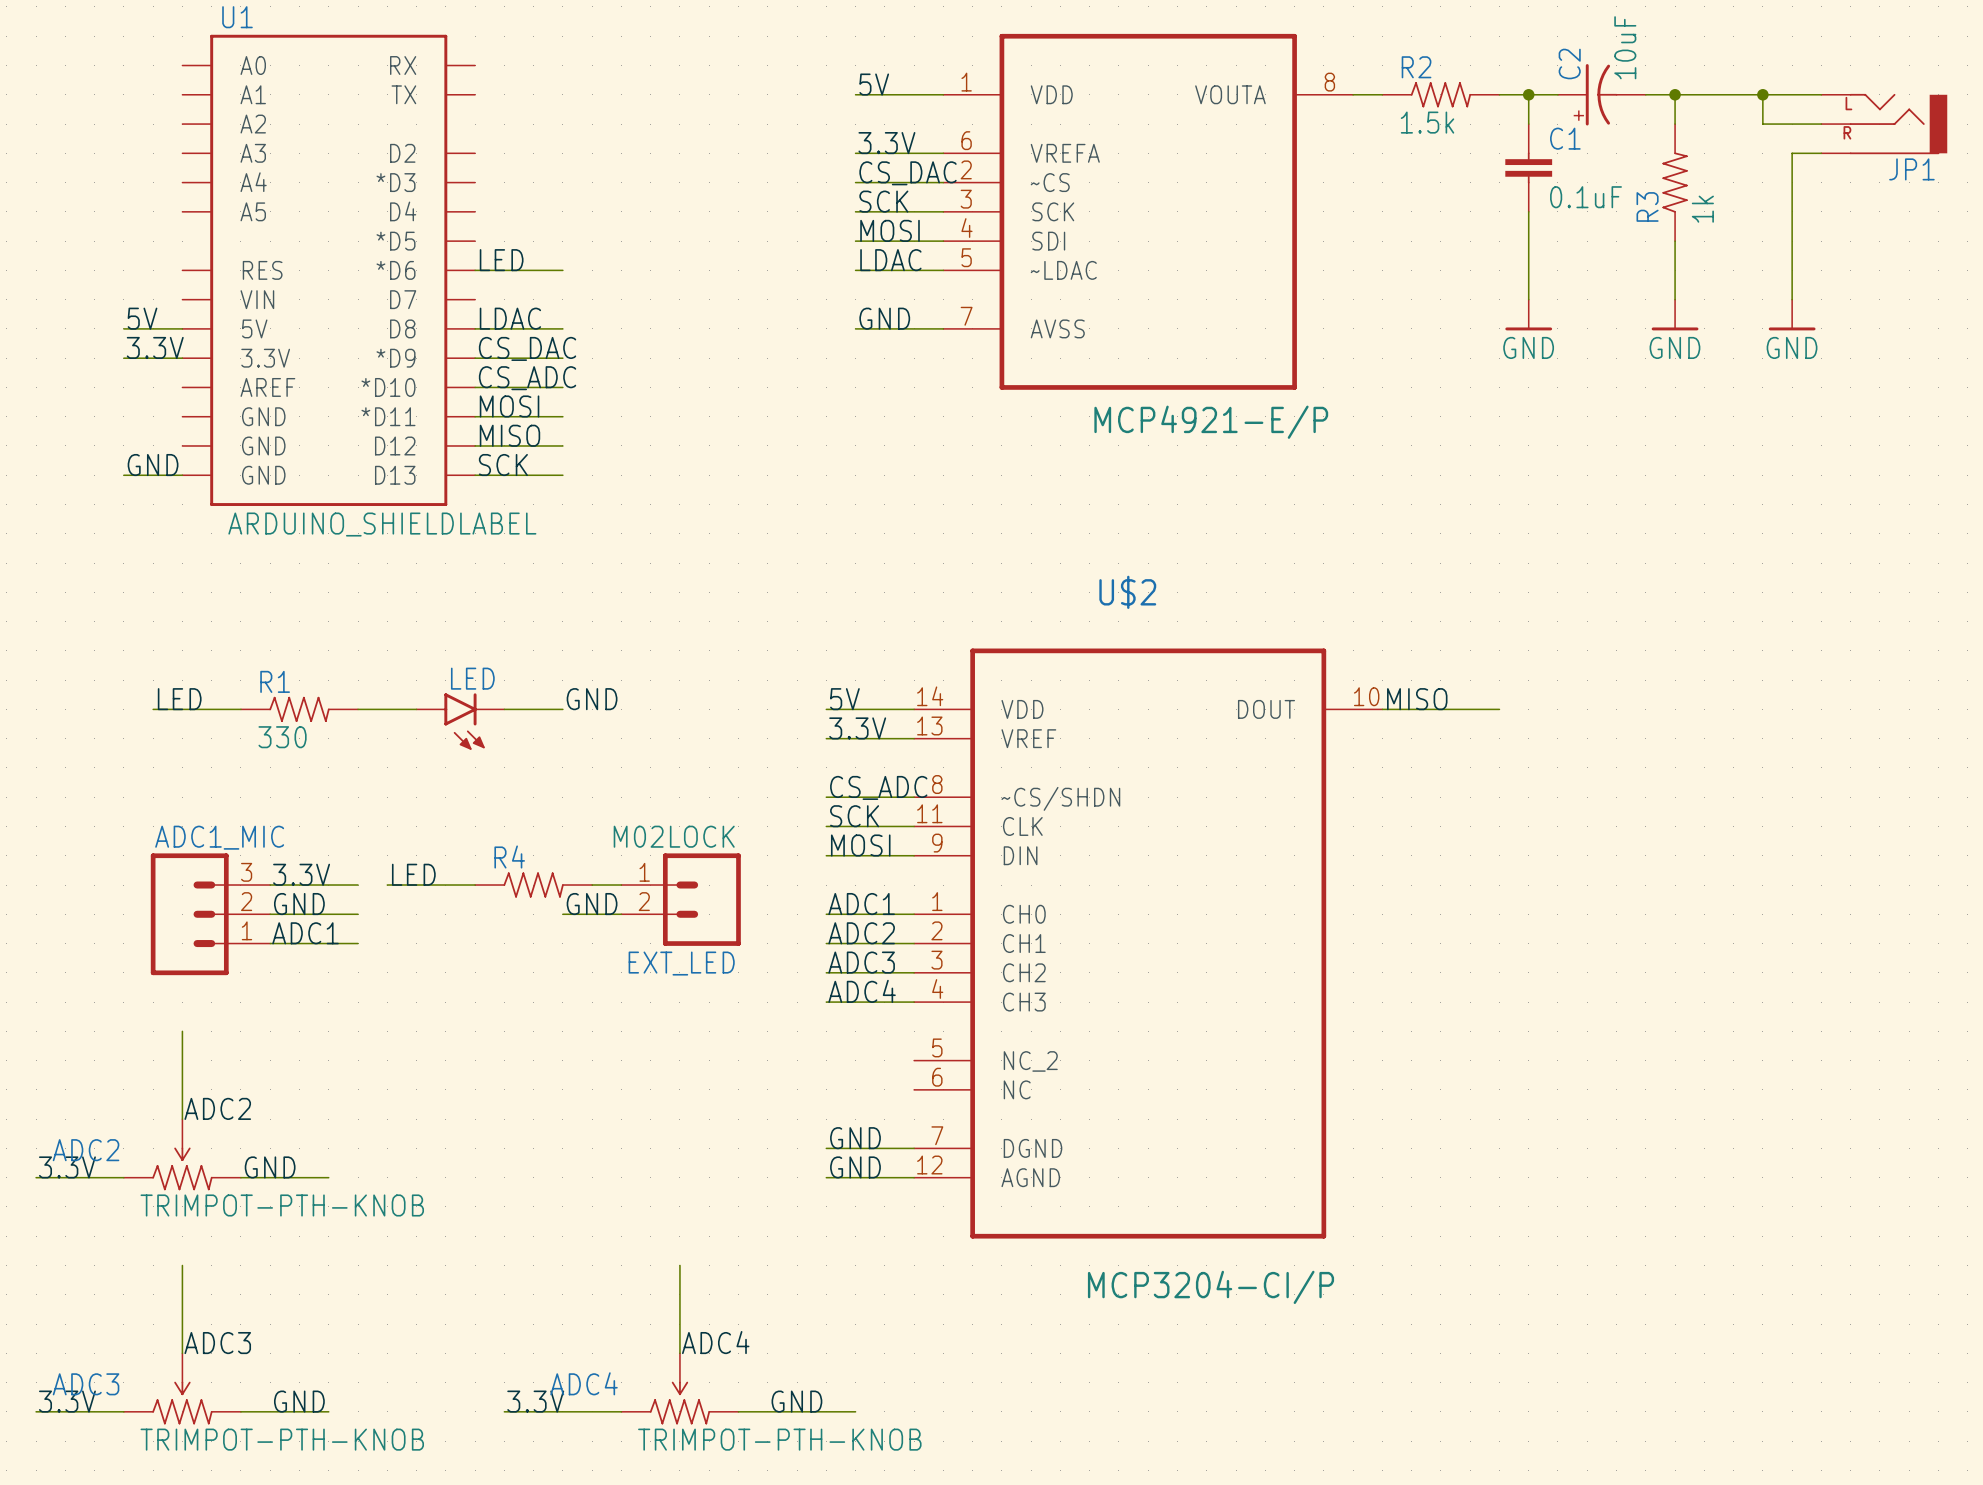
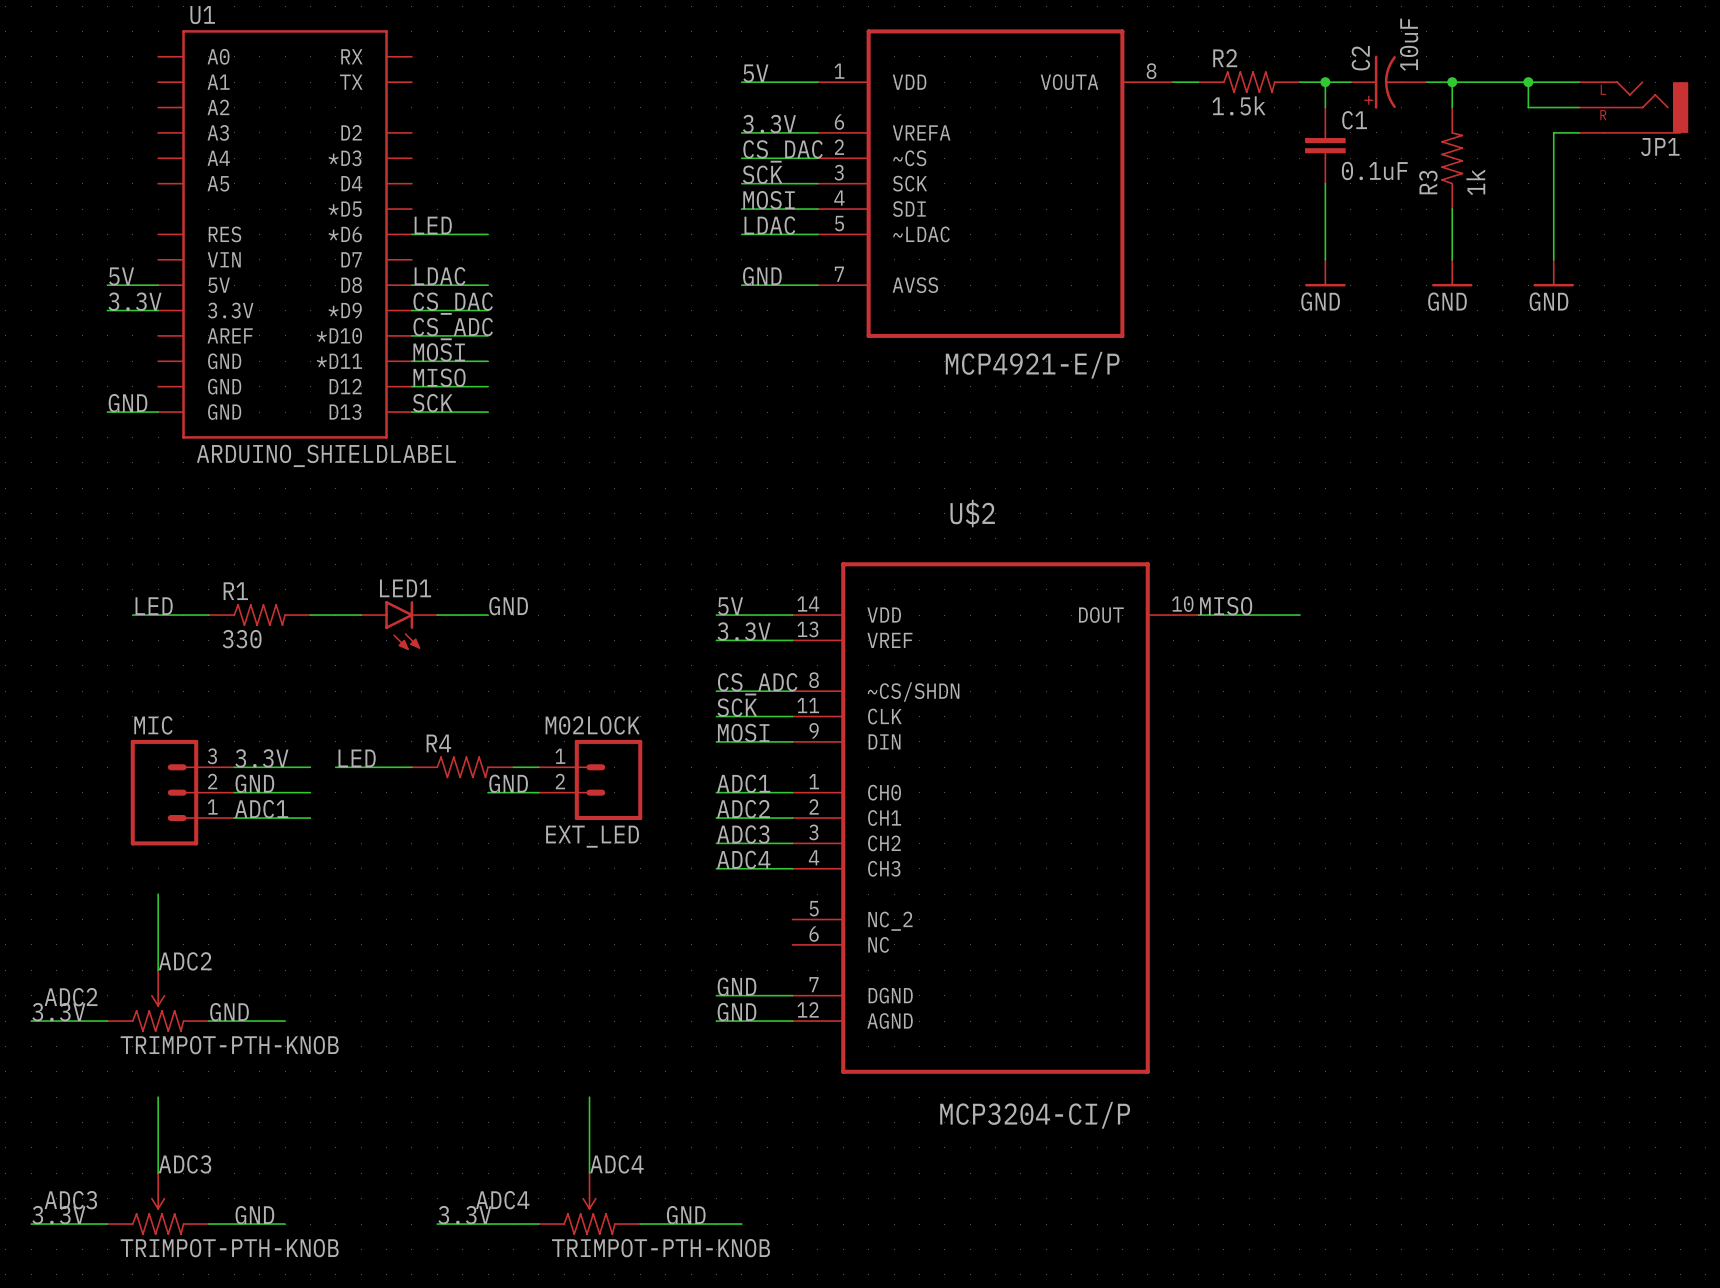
LED name: LED (472, 678) -> LED1 (405, 588)
ADC1_MIC name: ADC1_MIC (219, 837) -> MIC (153, 725)

